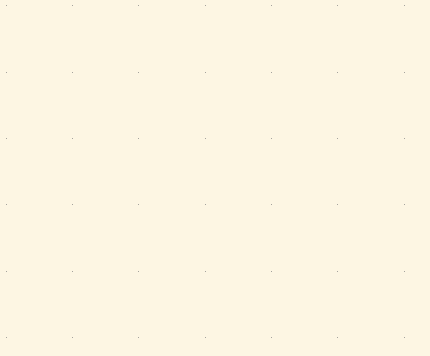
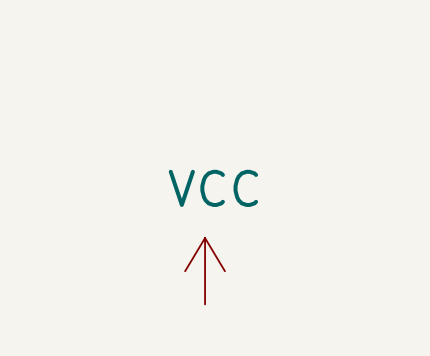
power symbol: none -> VCC (205, 271)

